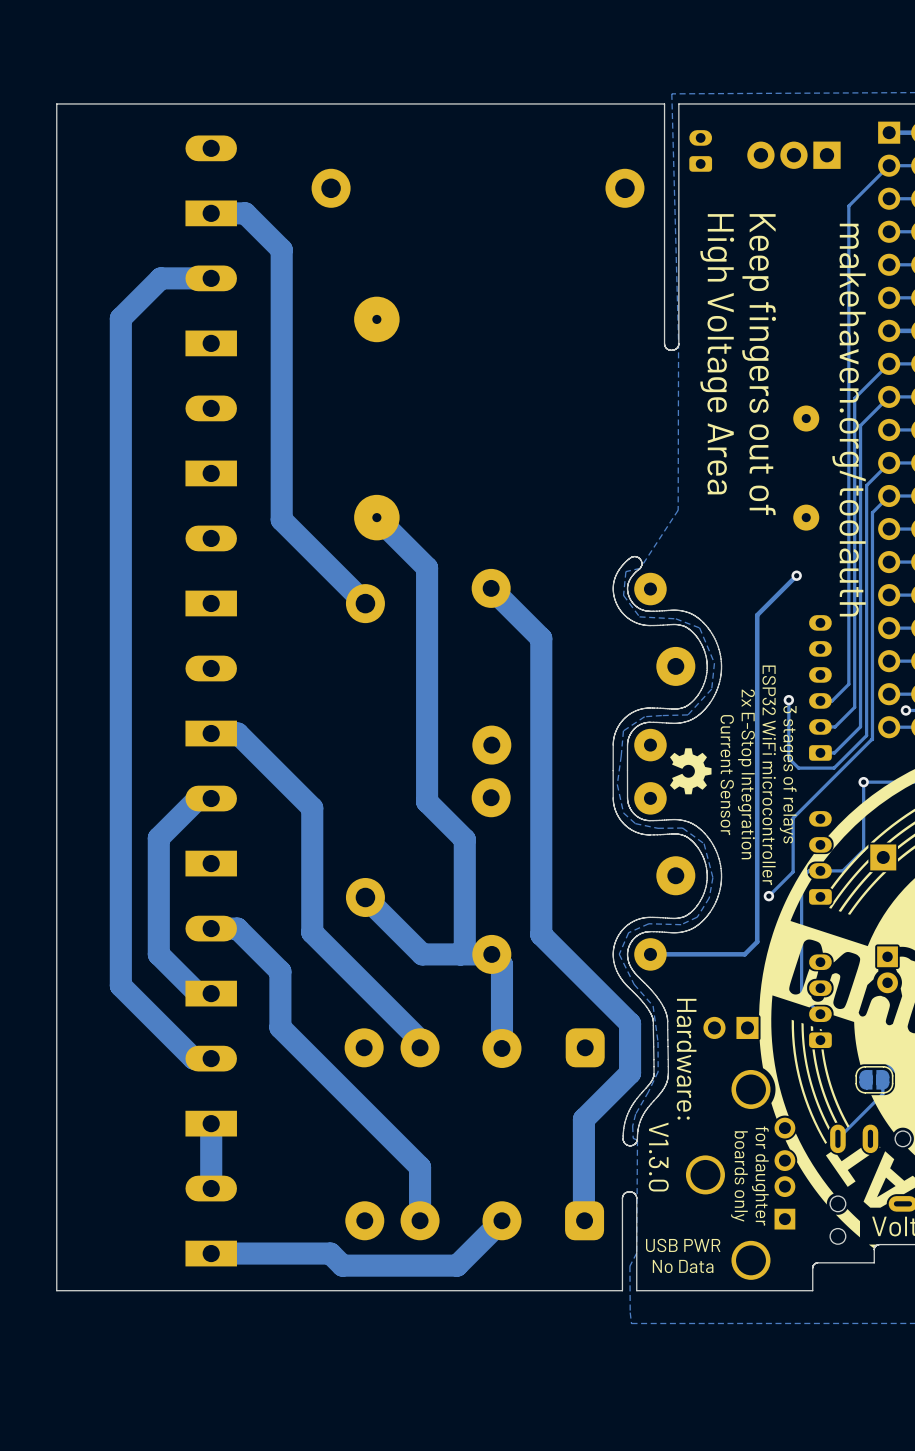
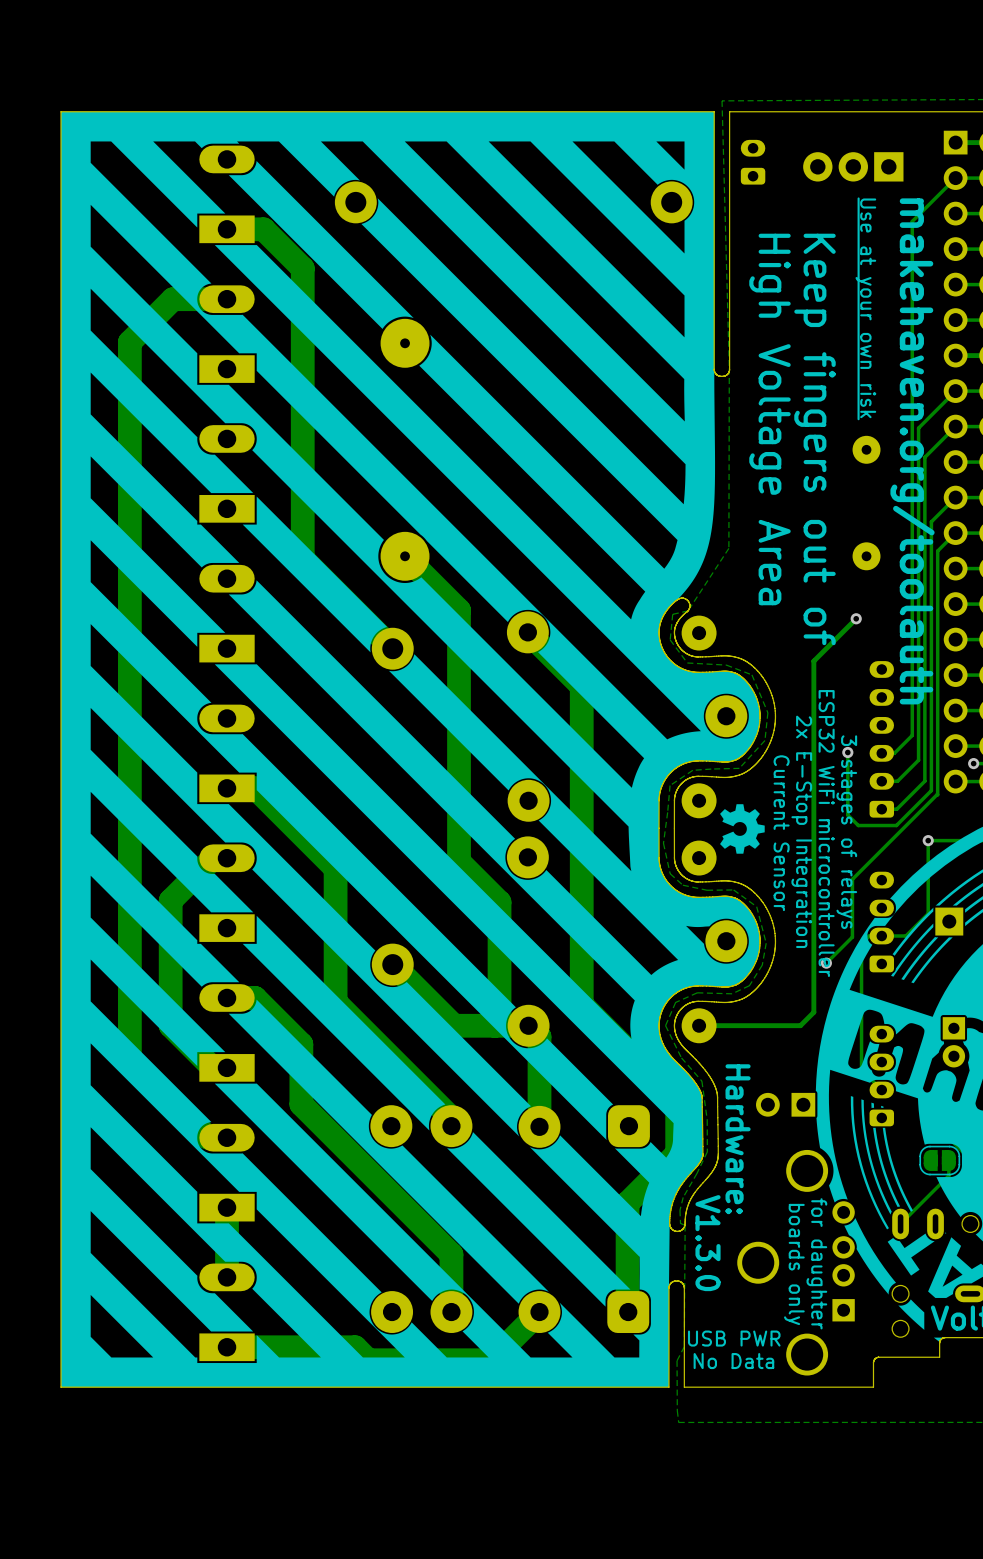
drawing: none -> [61, 111, 761, 1388]
line: none -> (858, 198) (858, 419)
text: none -> Use at your own risk (865, 308)

